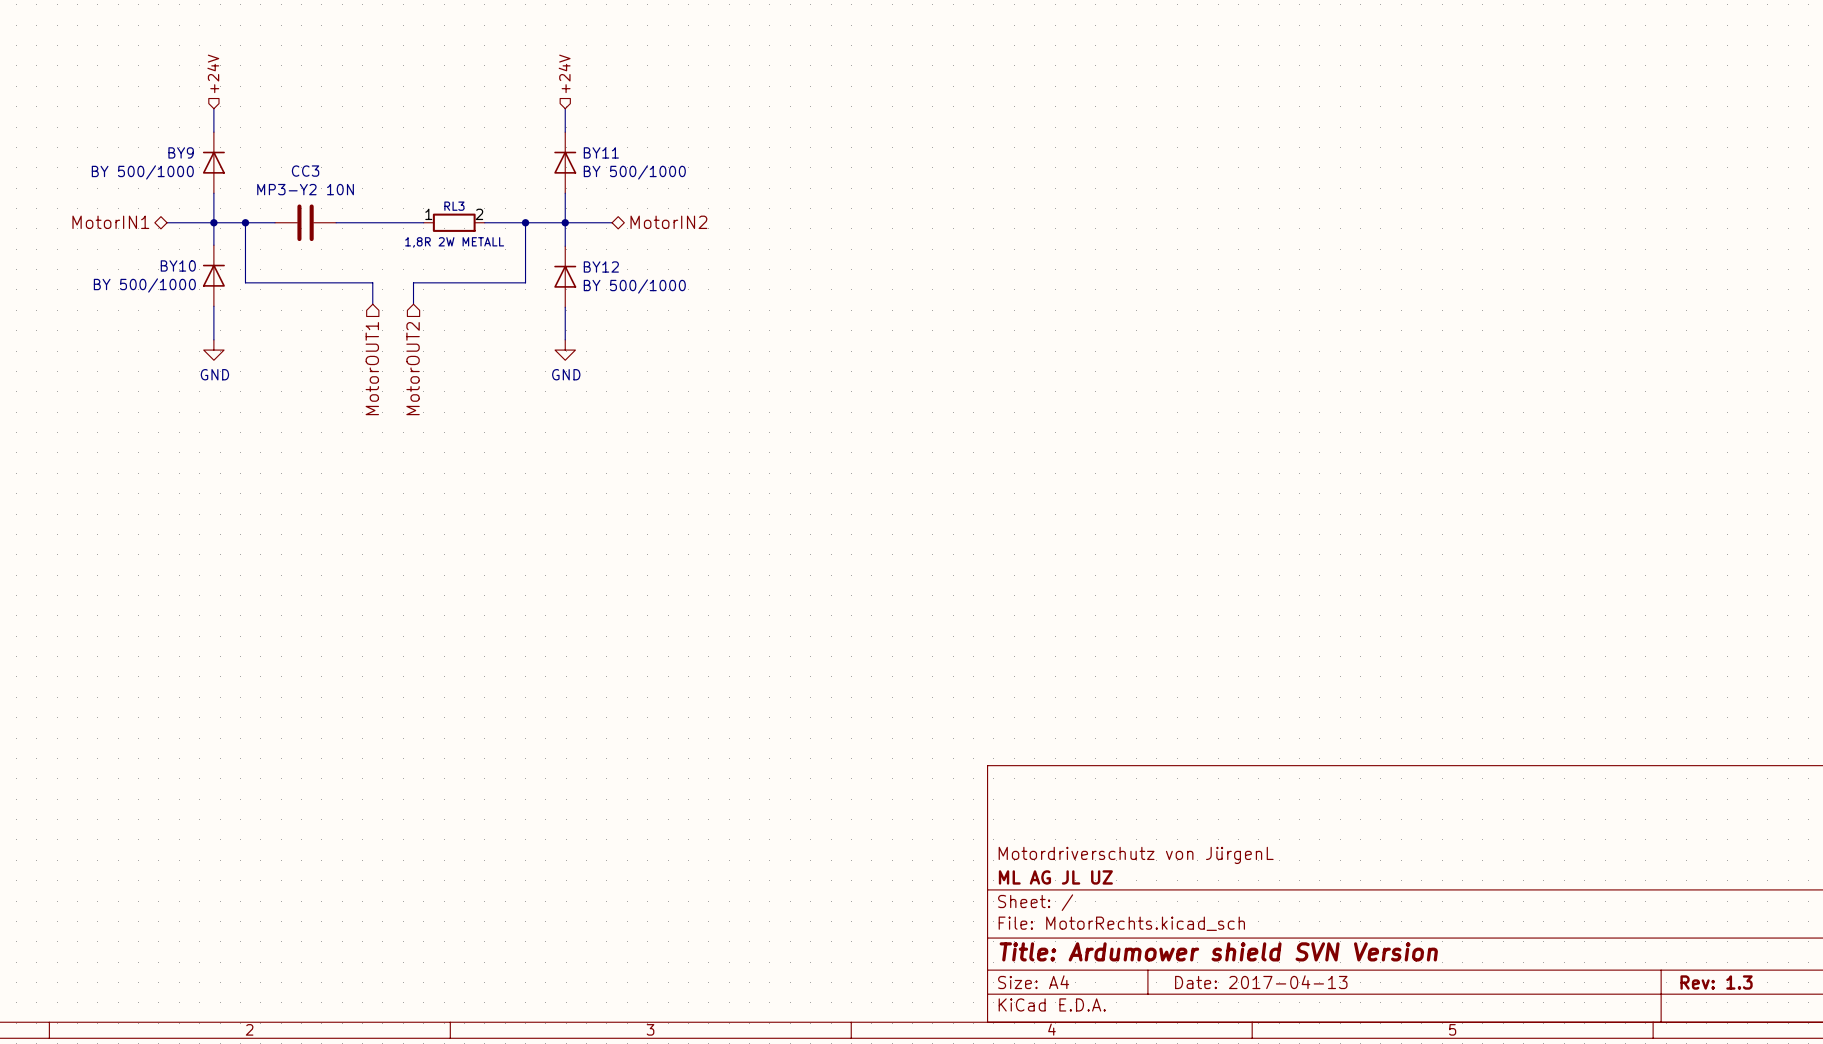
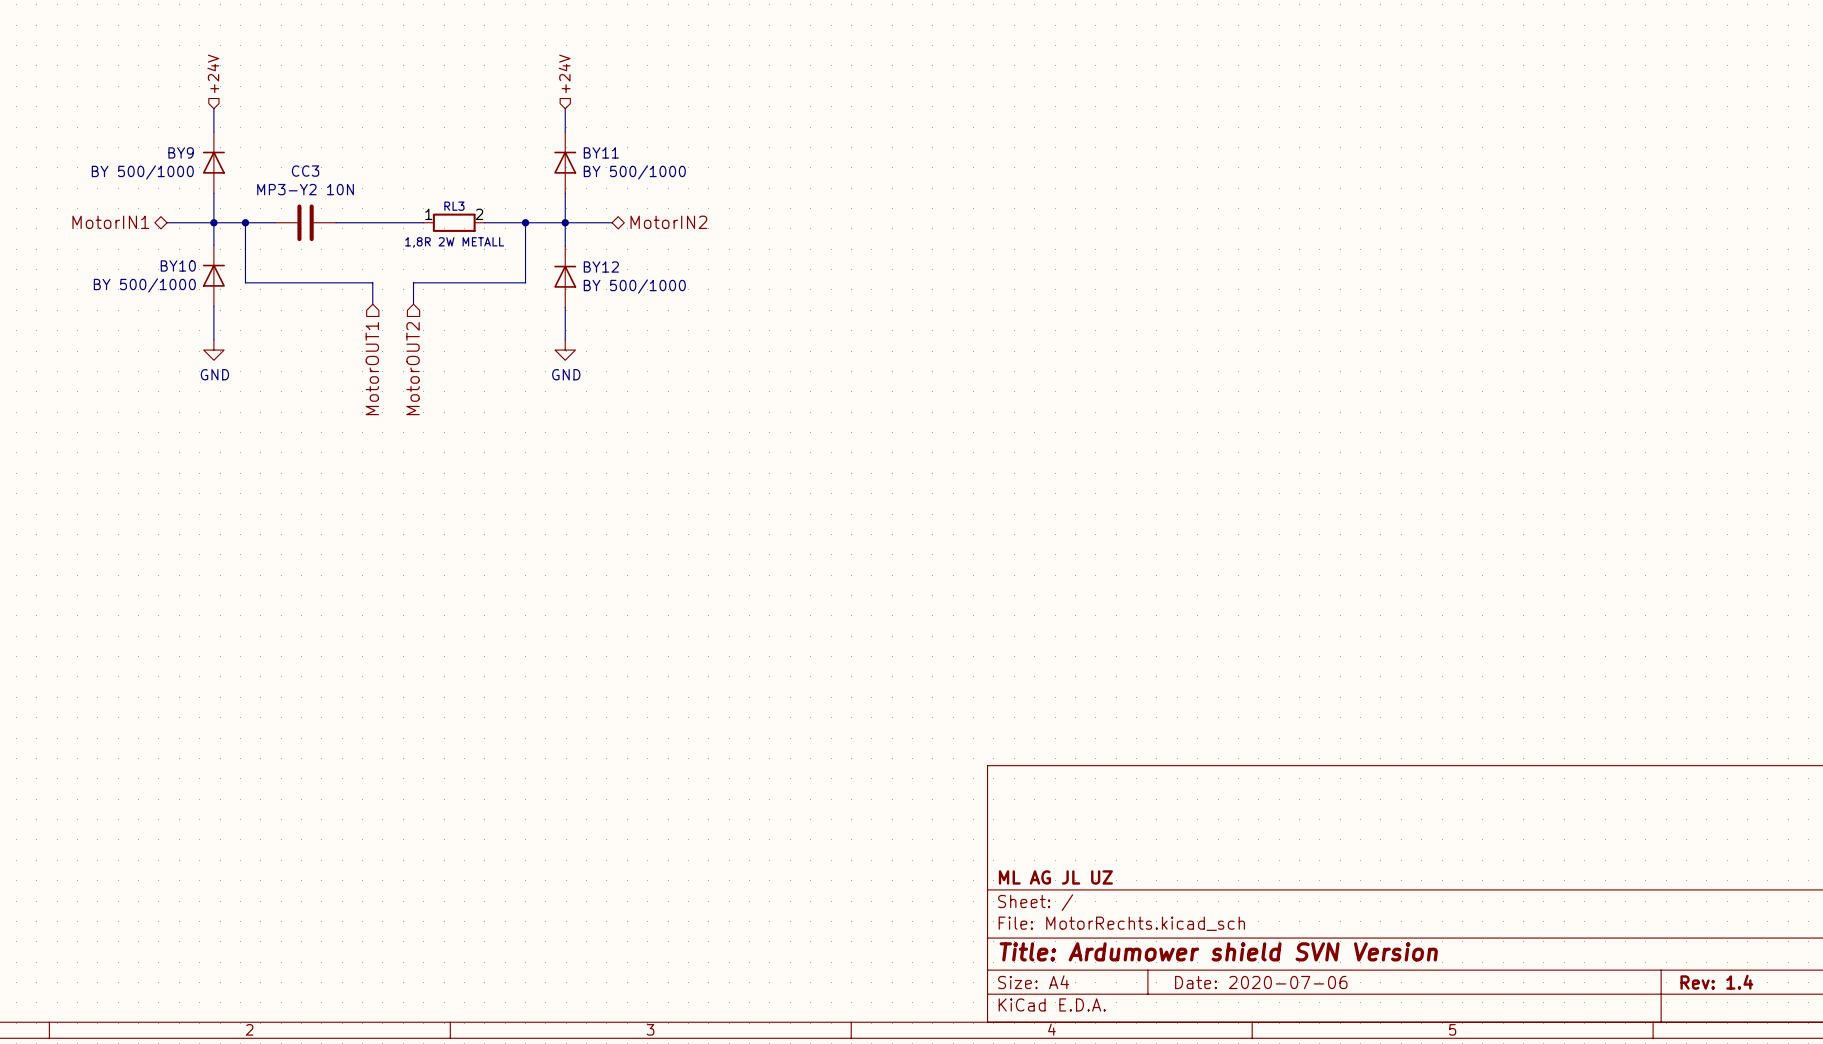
title block: Motordriverschutz von JürgenL (1136, 855) -> none
title block: Date: 2017-04-13 (1261, 982) -> Date: 2020-07-06 (1261, 982)
title block: Rev: 1.3 (1716, 982) -> Rev: 1.4 (1716, 982)

